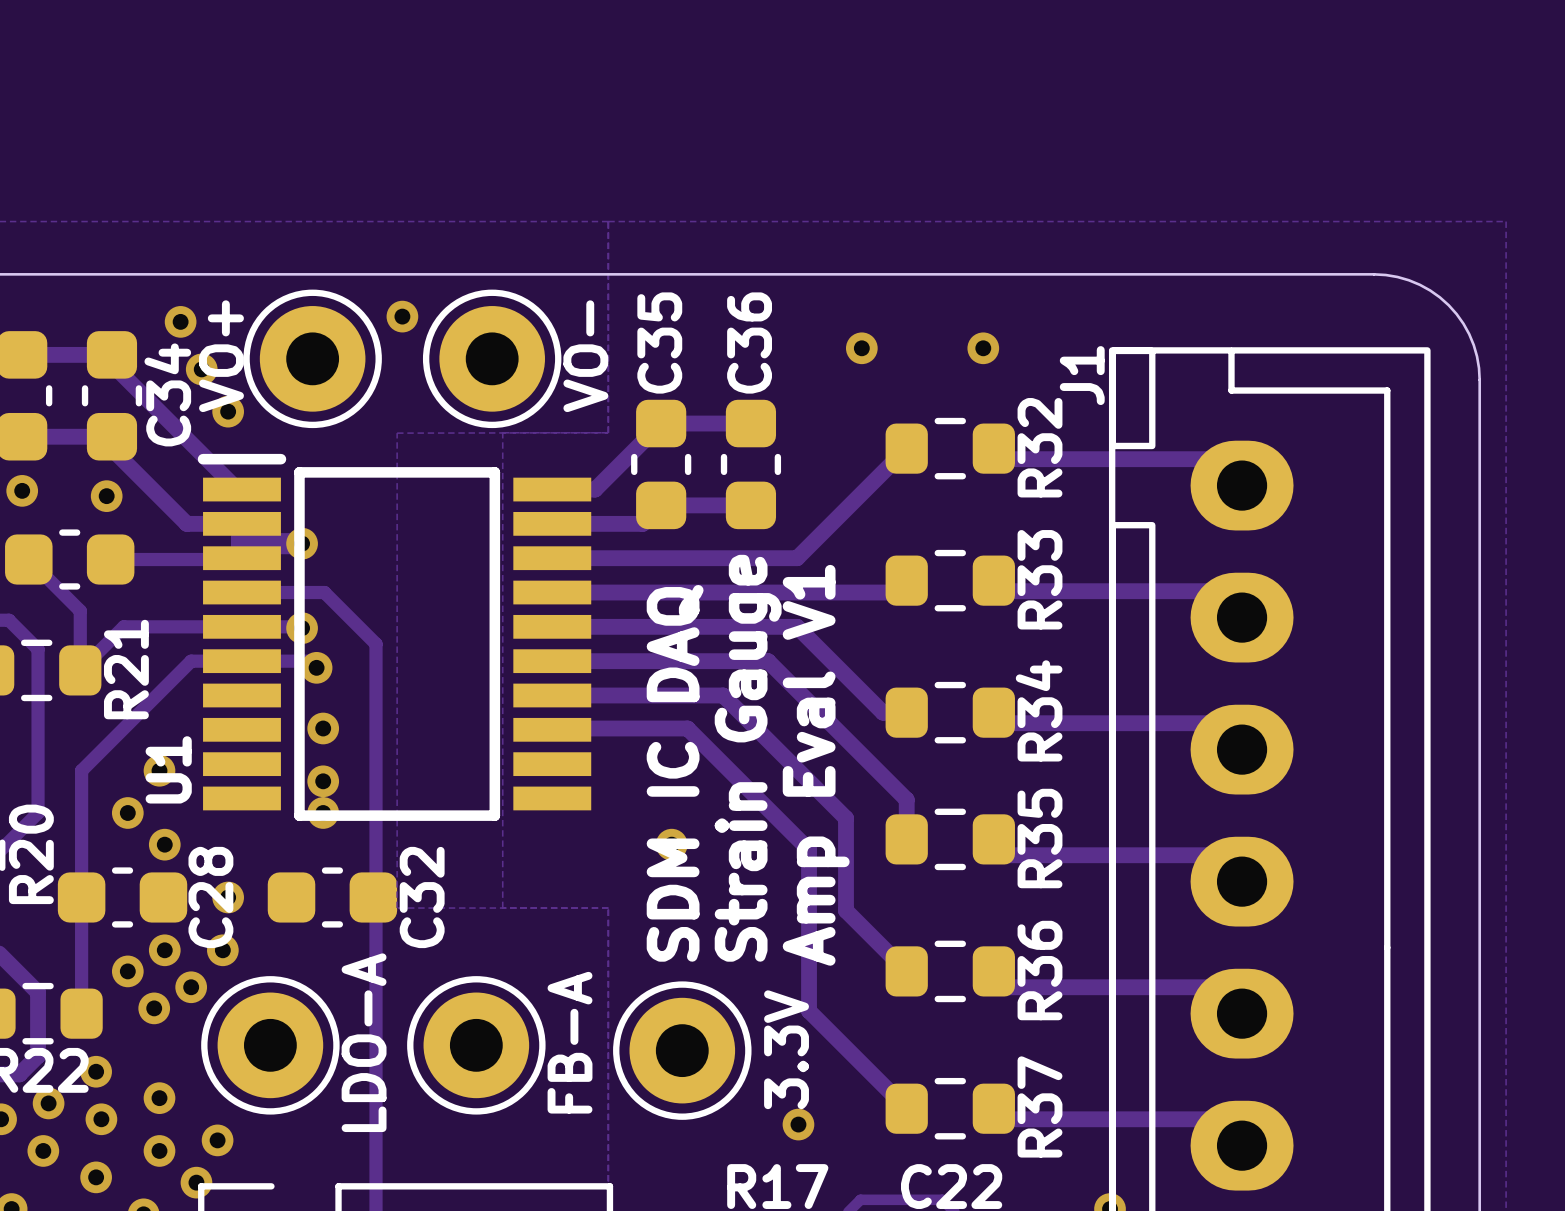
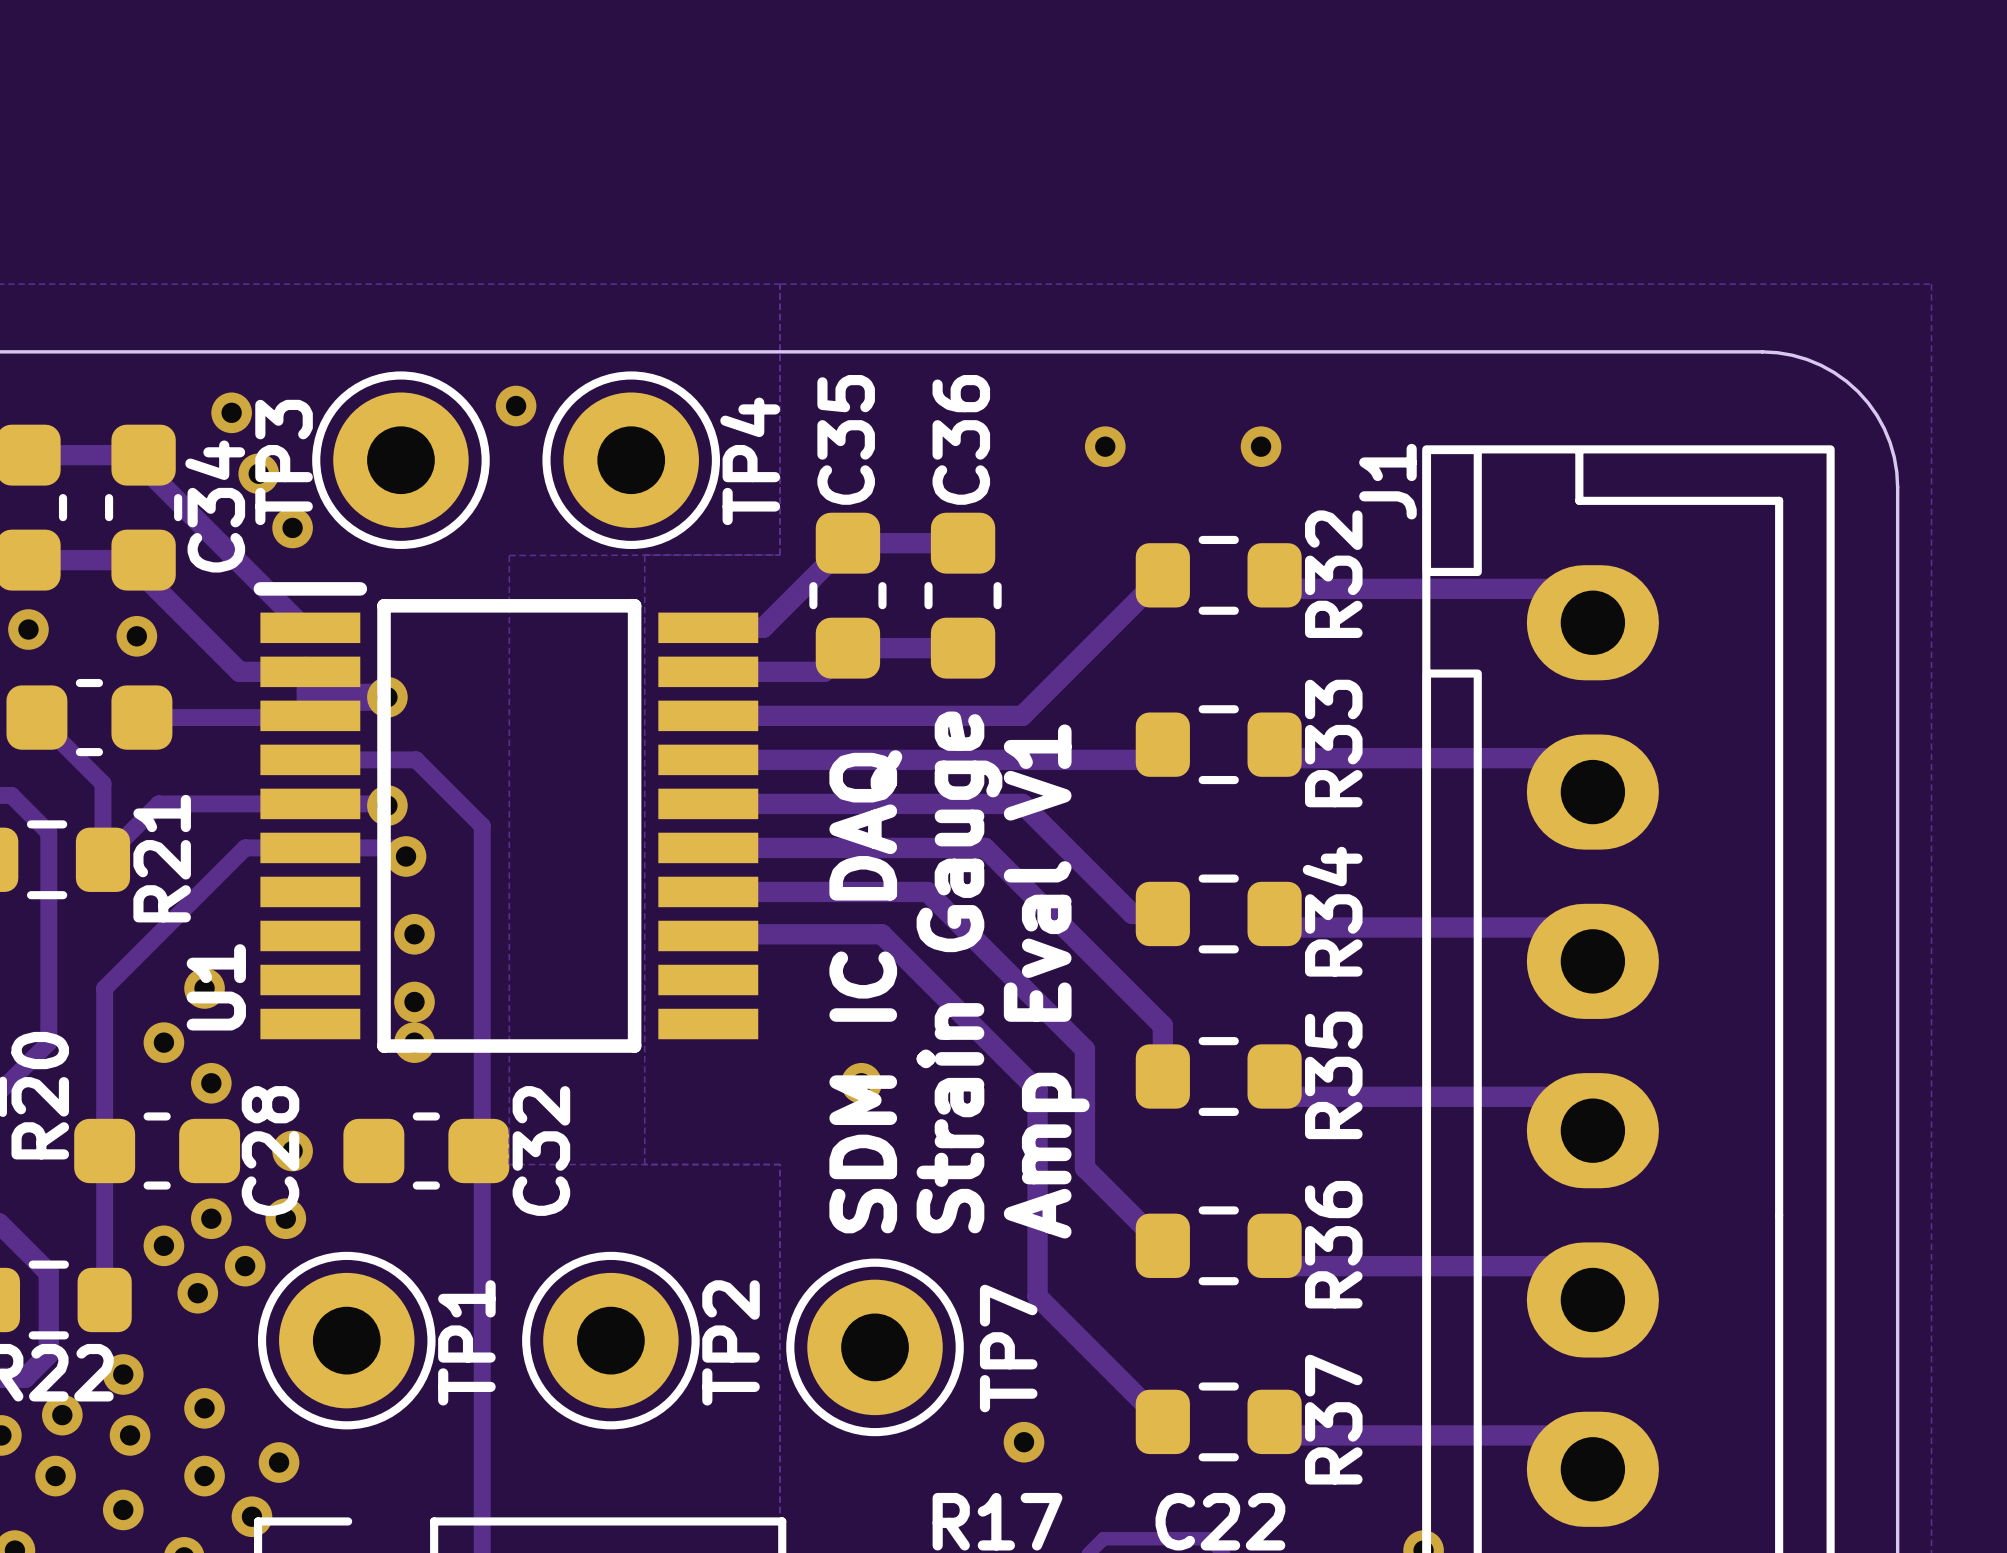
VO+ name: VO+ (221, 356) -> TP3 (284, 462)
VO- name: VO- (585, 356) -> TP4 (750, 461)
LDO-A name: LDO-A (364, 1042) -> TP1 (466, 1342)
FB-A name: FB-A (570, 1042) -> TP2 (731, 1342)
3.3V name: 3.3V (786, 1049) -> TP7 (1008, 1348)

